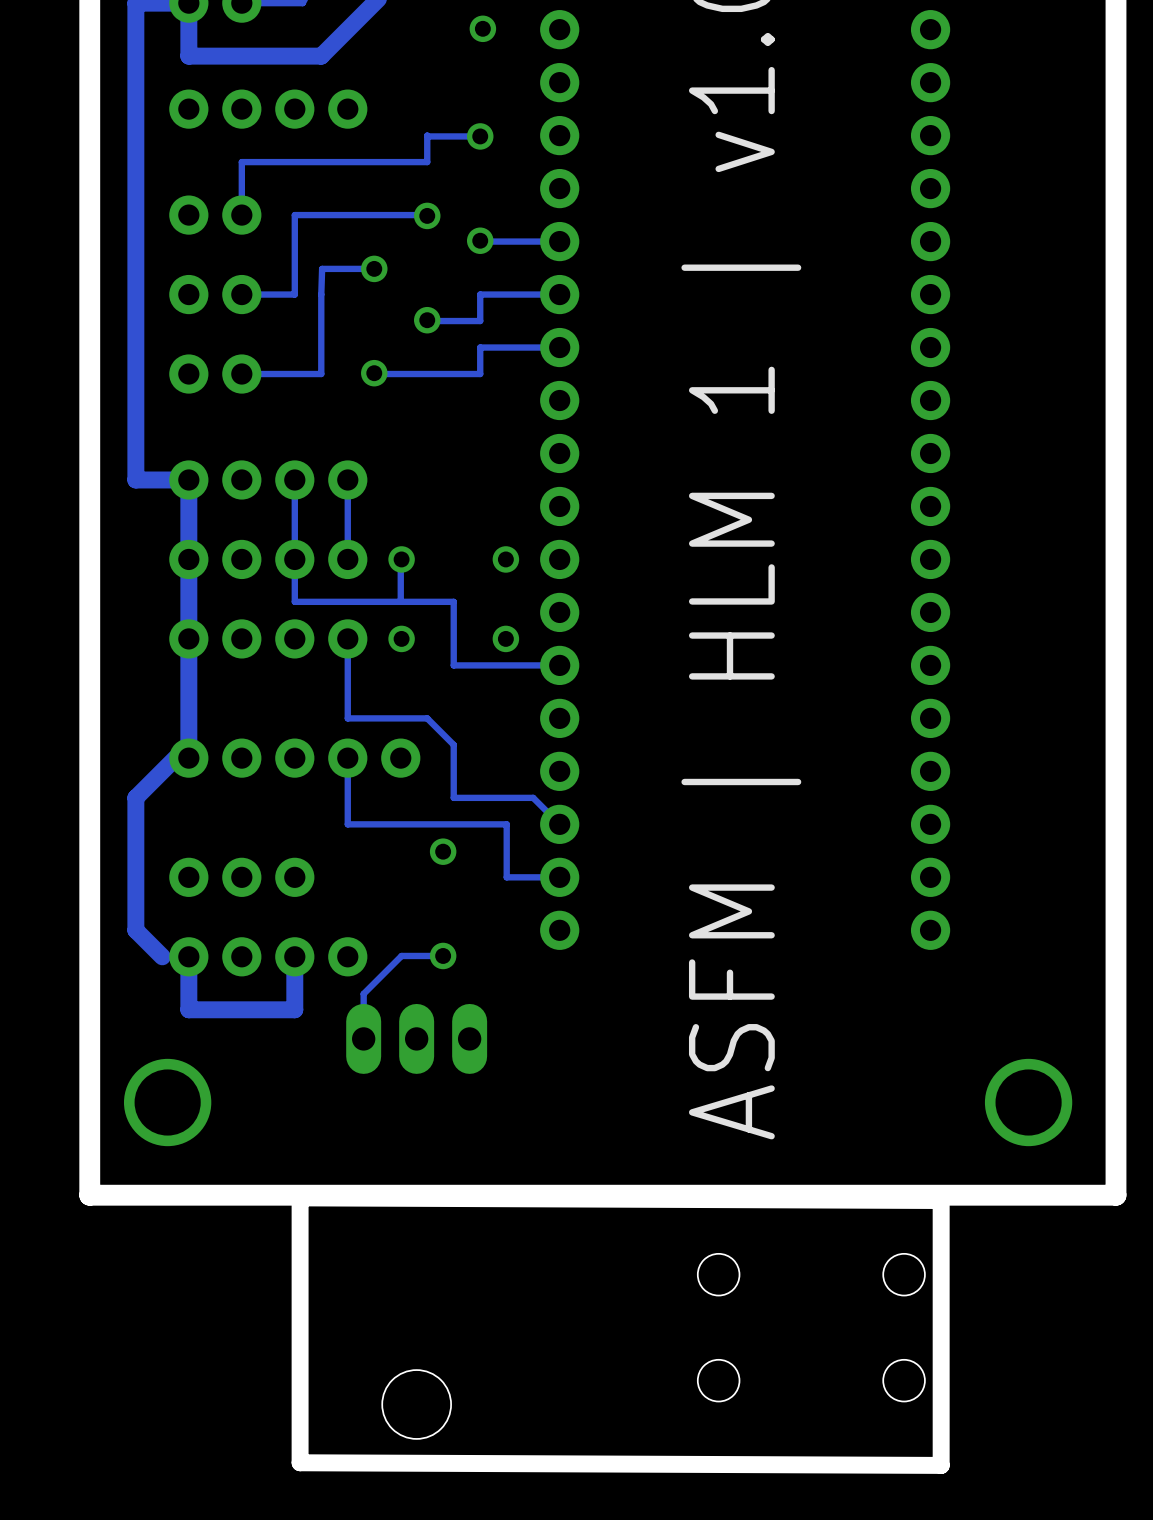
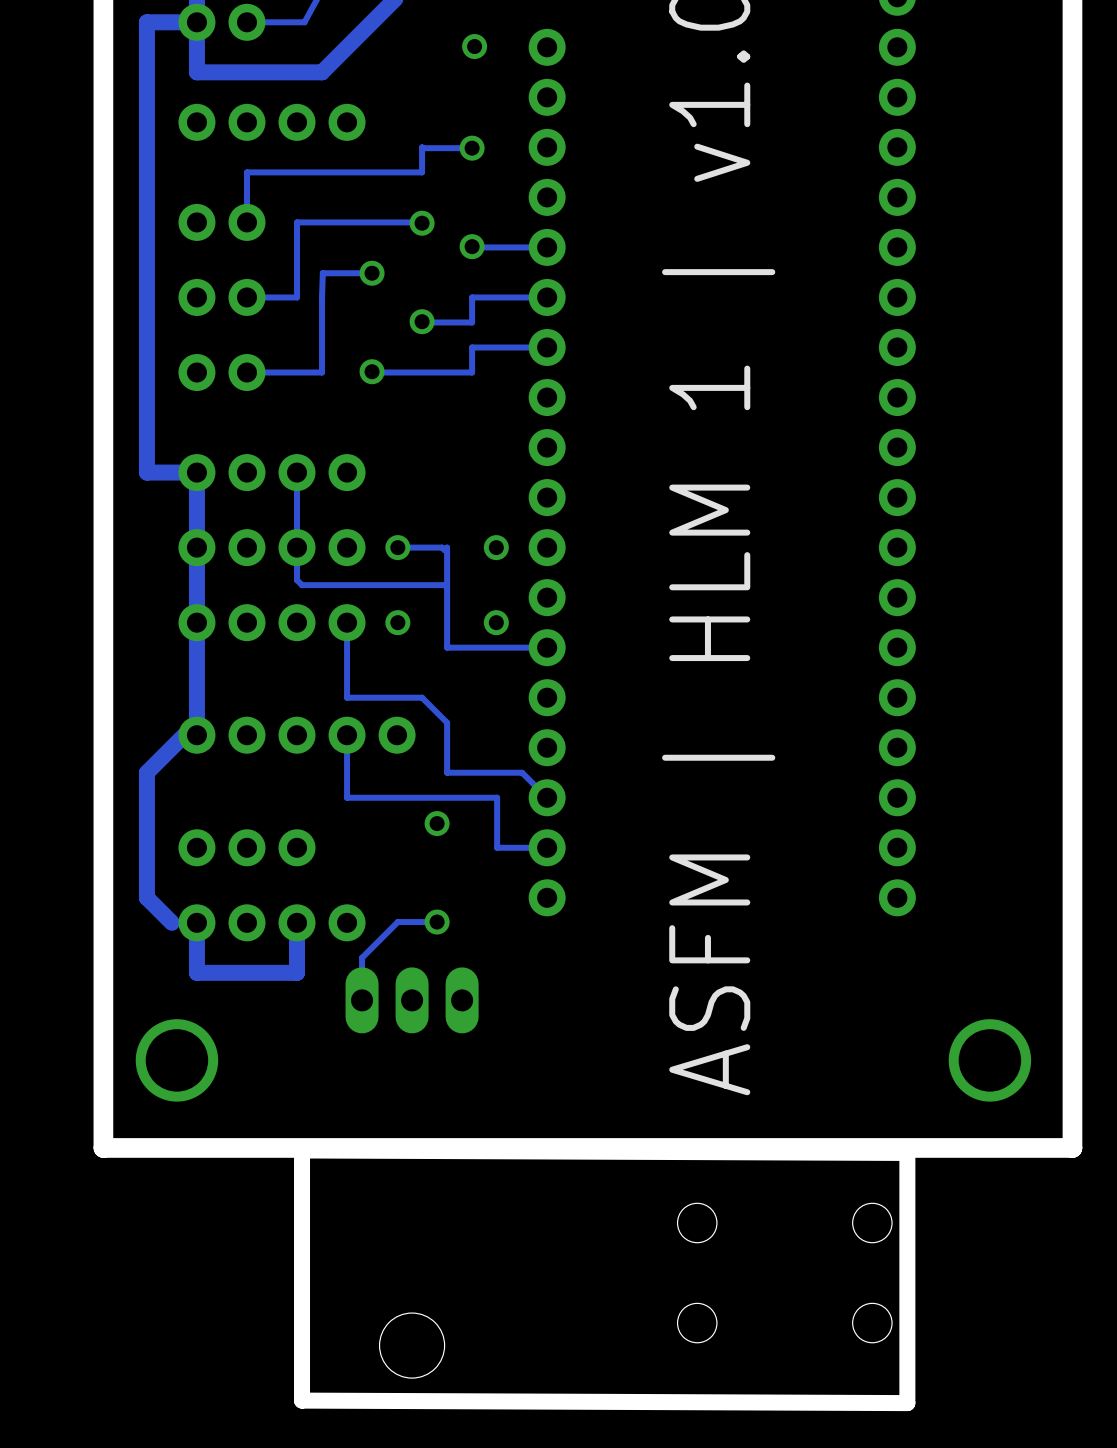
track: (347, 479) (347, 559) -> none
track: (401, 559) (400, 601) -> none
track: (294, 593) (294, 601) (453, 601) -> (297, 580) (302, 585) (444, 585) (447, 587) (447, 547) (444, 550) (442, 547) (397, 547)

